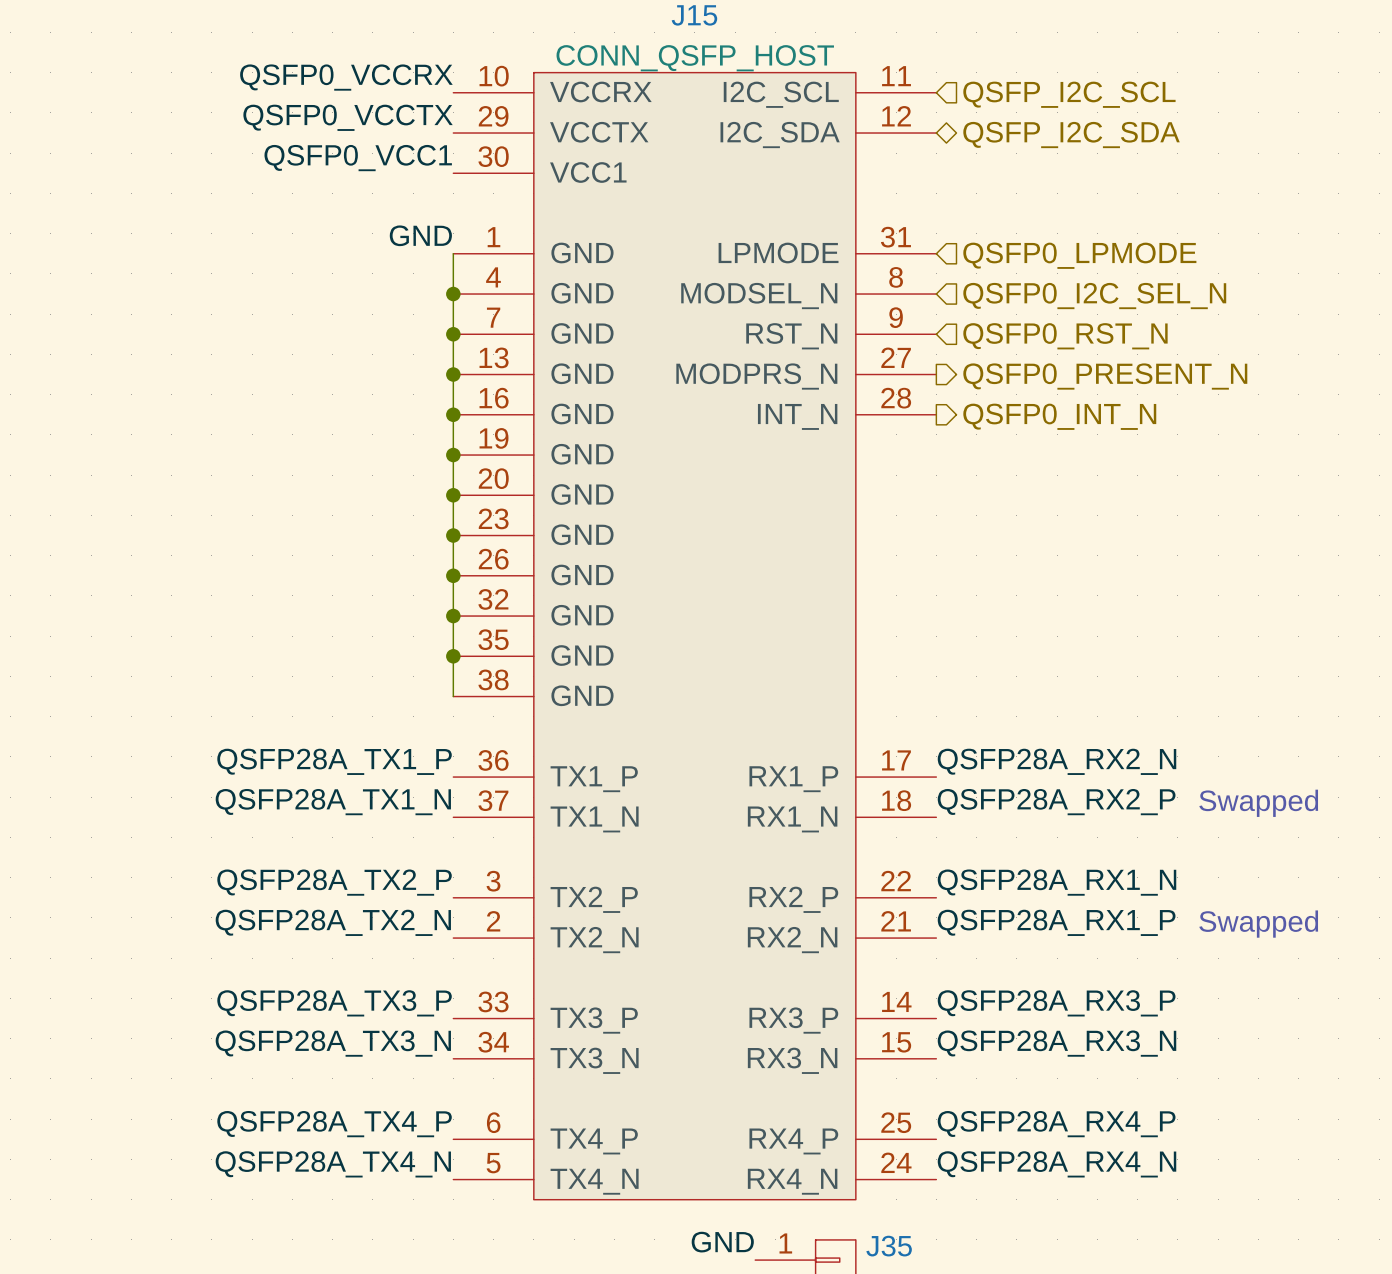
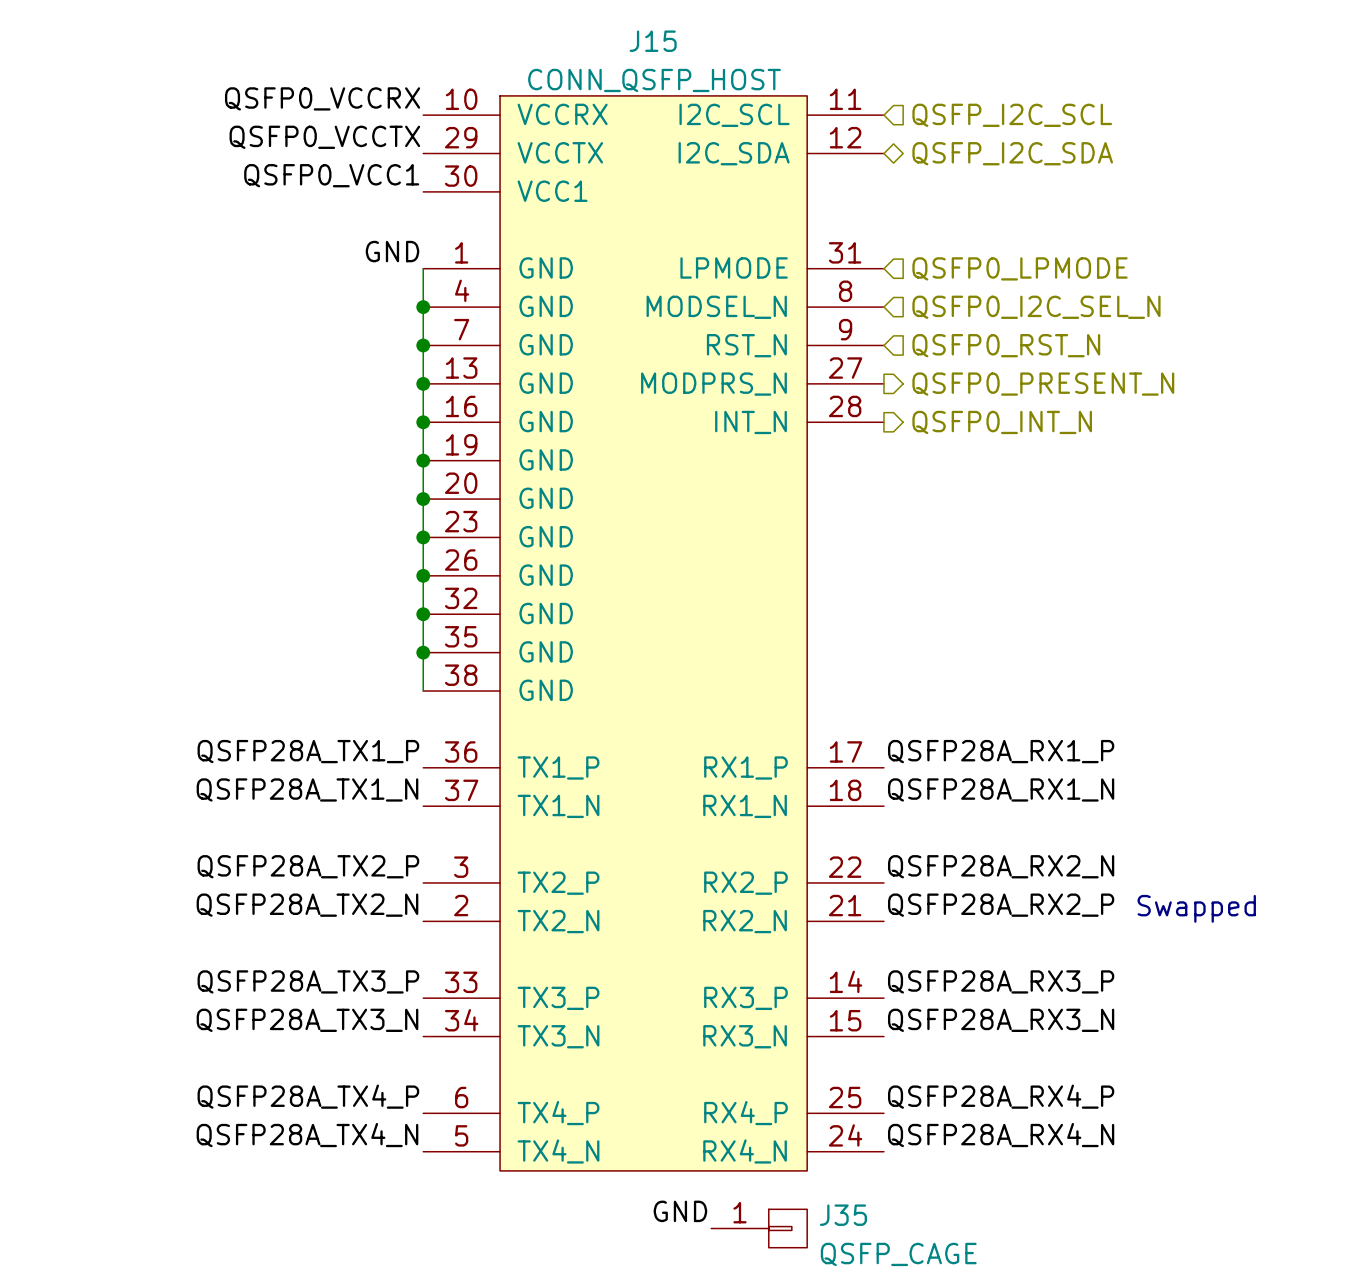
label: QSFP28A_RX2_N (1057, 761) -> QSFP28A_RX1_P (1001, 751)
label: QSFP28A_RX2_P (1056, 802) -> QSFP28A_RX1_N (1001, 789)
text: Swapped (1258, 803) -> none
label: QSFP28A_RX1_N (1057, 882) -> QSFP28A_RX2_N (1001, 866)
label: QSFP28A_RX1_P (1056, 922) -> QSFP28A_RX2_P (1001, 905)

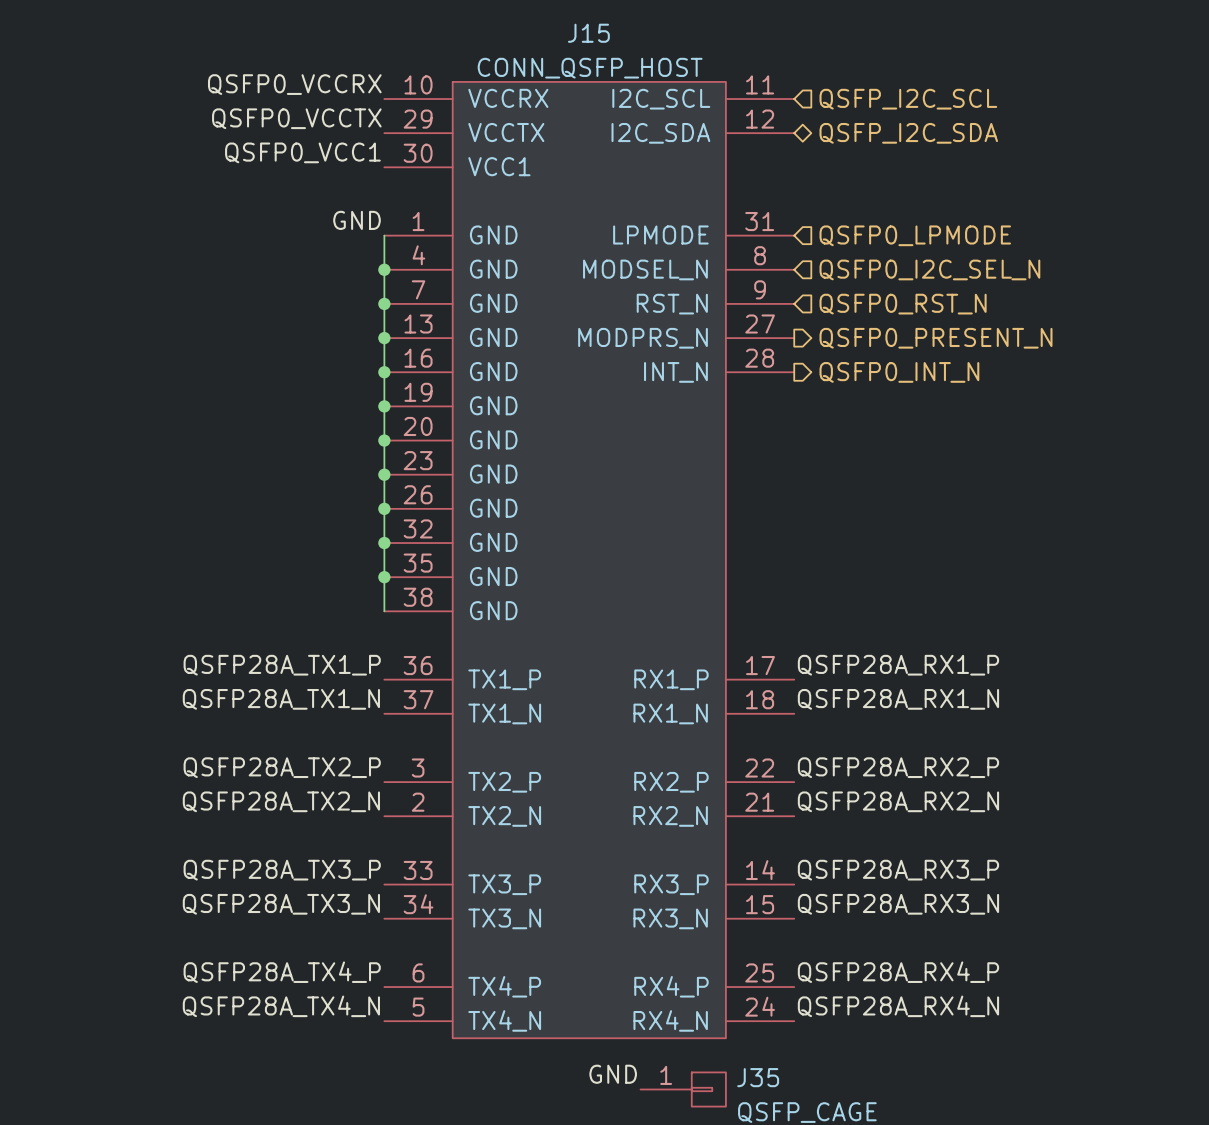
label: QSFP28A_RX2_N (1001, 866) -> QSFP28A_RX2_P (898, 767)
label: QSFP28A_RX2_P (1001, 905) -> QSFP28A_RX2_N (898, 801)
text: Swapped (1196, 908) -> none

